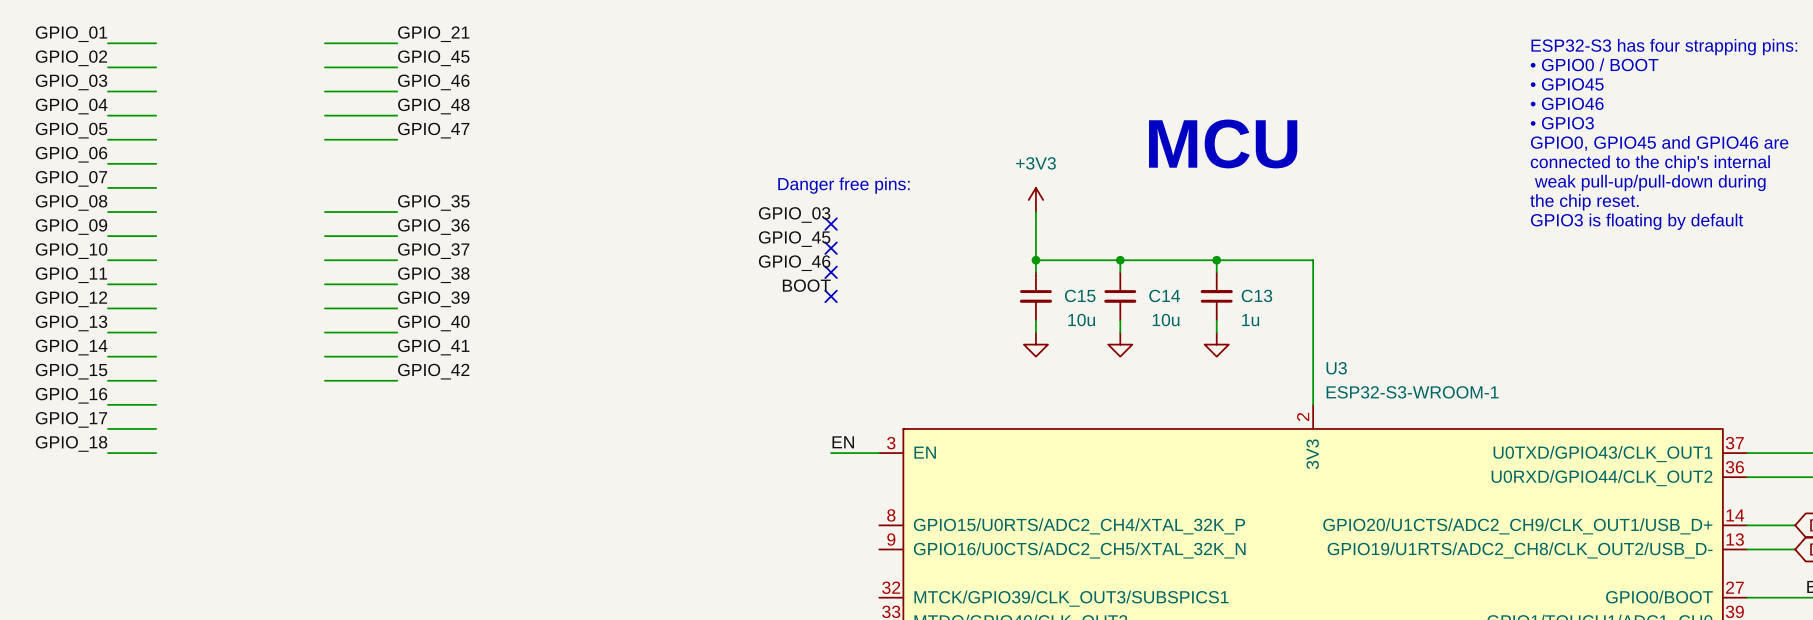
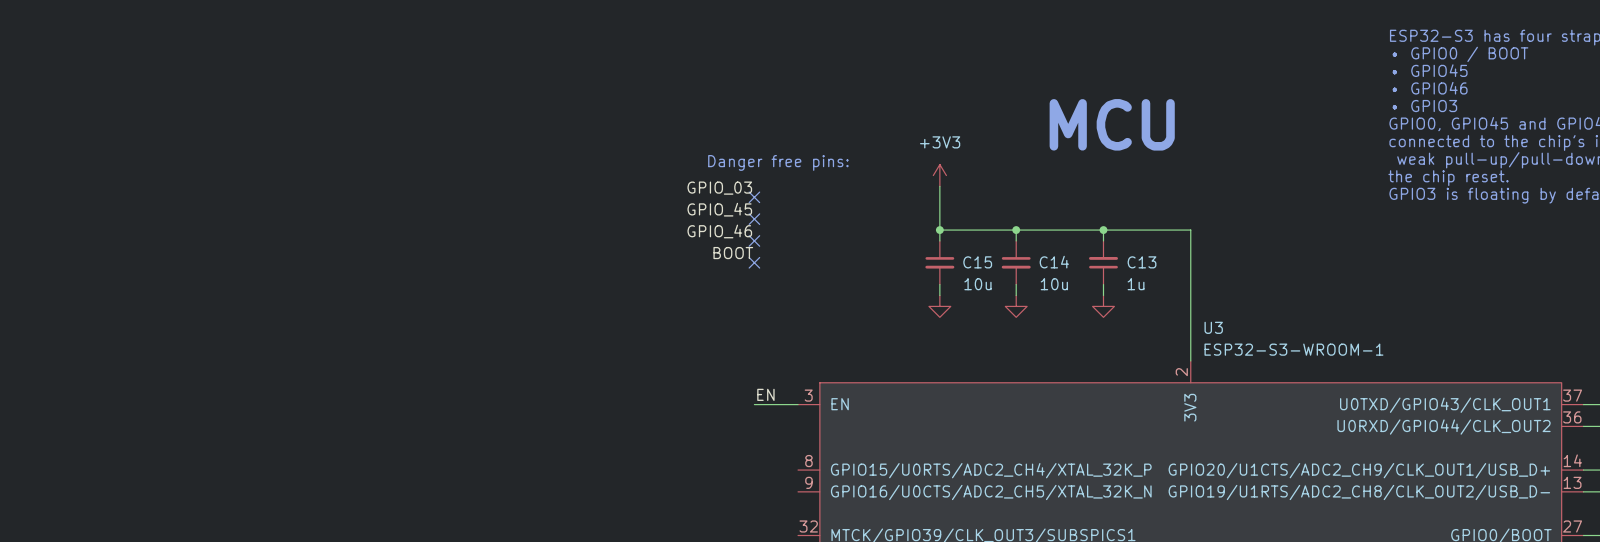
label: GPIO_01 (71, 34) -> none
label: GPIO_21 (433, 34) -> none
wire: (107, 43) (156, 43) -> none
wire: (324, 43) (397, 43) -> none
label: GPIO_02 (71, 58) -> none
label: GPIO_45 (433, 58) -> none
wire: (107, 67) (156, 67) -> none
wire: (324, 67) (397, 67) -> none
label: GPIO_03 (71, 82) -> none
label: GPIO_46 (433, 82) -> none
wire: (107, 91) (156, 91) -> none
wire: (324, 91) (397, 91) -> none
label: GPIO_04 (71, 106) -> none
label: GPIO_48 (433, 106) -> none
wire: (107, 115) (156, 115) -> none
wire: (324, 115) (397, 115) -> none
label: GPIO_05 (71, 130) -> none
label: GPIO_47 (433, 130) -> none
wire: (107, 139) (156, 139) -> none
wire: (324, 139) (397, 139) -> none
label: GPIO_06 (71, 154) -> none
wire: (107, 163) (156, 163) -> none
label: GPIO_07 (71, 178) -> none
wire: (107, 187) (156, 187) -> none
label: GPIO_08 (71, 202) -> none
label: GPIO_35 (433, 202) -> none
wire: (107, 212) (156, 212) -> none
wire: (324, 212) (397, 212) -> none
label: GPIO_09 (71, 227) -> none
label: GPIO_36 (433, 227) -> none
wire: (107, 236) (156, 236) -> none
wire: (324, 236) (397, 236) -> none
label: GPIO_10 (71, 251) -> none
label: GPIO_37 (433, 251) -> none
wire: (107, 260) (156, 260) -> none
wire: (324, 260) (397, 260) -> none
label: GPIO_11 (71, 275) -> none
label: GPIO_38 (433, 275) -> none
wire: (107, 284) (156, 284) -> none
wire: (324, 284) (397, 284) -> none
label: GPIO_12 (71, 299) -> none
label: GPIO_39 (433, 299) -> none
wire: (107, 308) (156, 308) -> none
wire: (324, 308) (397, 308) -> none
label: GPIO_13 (71, 323) -> none
label: GPIO_40 (433, 323) -> none
wire: (107, 332) (156, 332) -> none
wire: (324, 332) (397, 332) -> none
label: GPIO_14 (71, 347) -> none
label: GPIO_41 (433, 347) -> none
wire: (107, 356) (156, 356) -> none
wire: (324, 356) (397, 356) -> none
label: GPIO_15 (71, 371) -> none
label: GPIO_42 (433, 371) -> none
wire: (107, 380) (156, 380) -> none
wire: (324, 380) (397, 380) -> none
label: GPIO_16 (71, 395) -> none
wire: (107, 404) (156, 404) -> none
label: GPIO_17 (71, 419) -> none
wire: (107, 428) (156, 428) -> none
label: GPIO_18 (71, 443) -> none
wire: (107, 453) (156, 453) -> none

